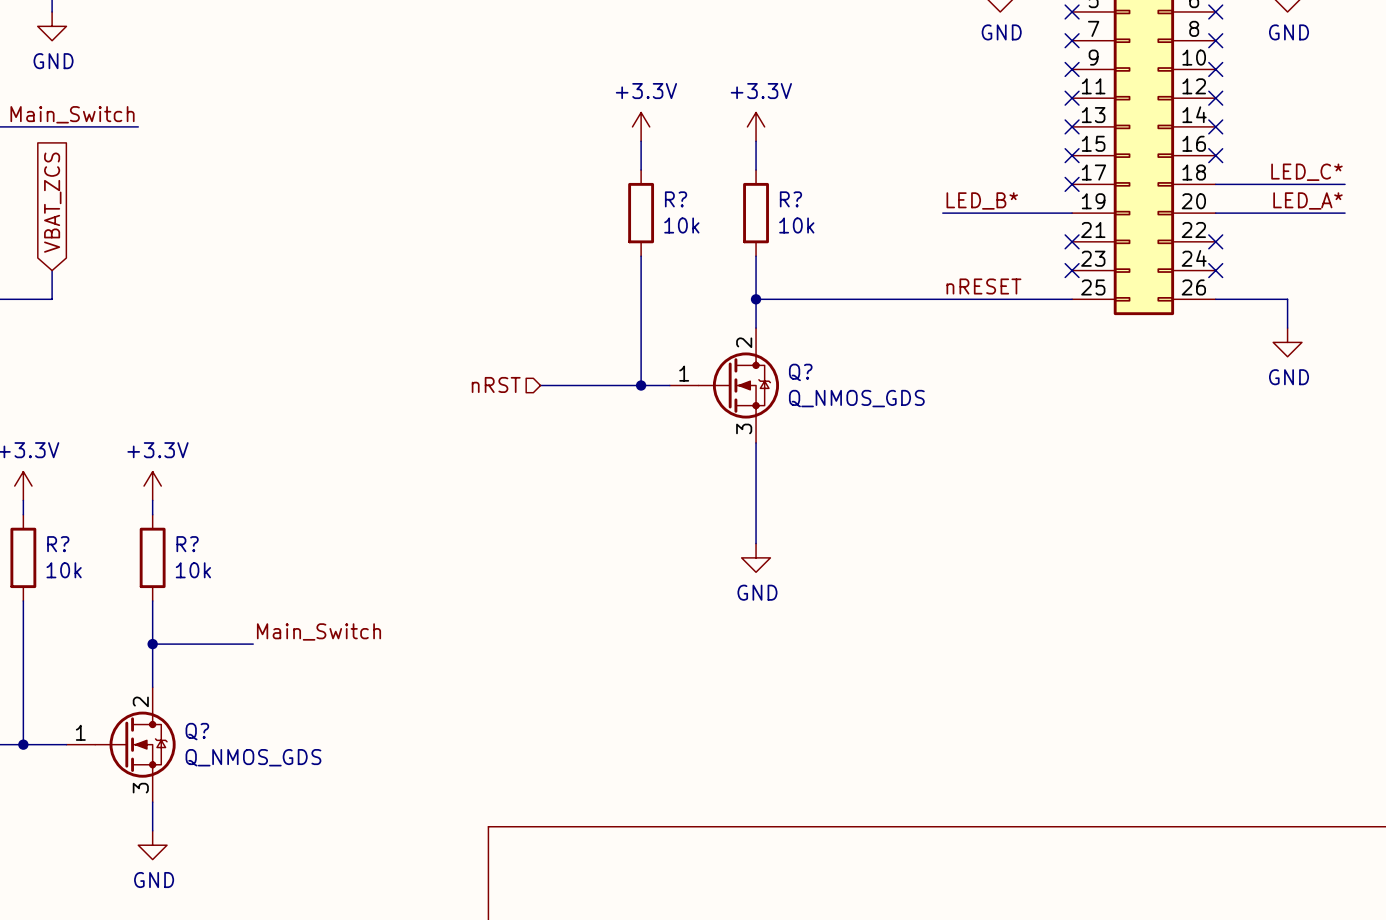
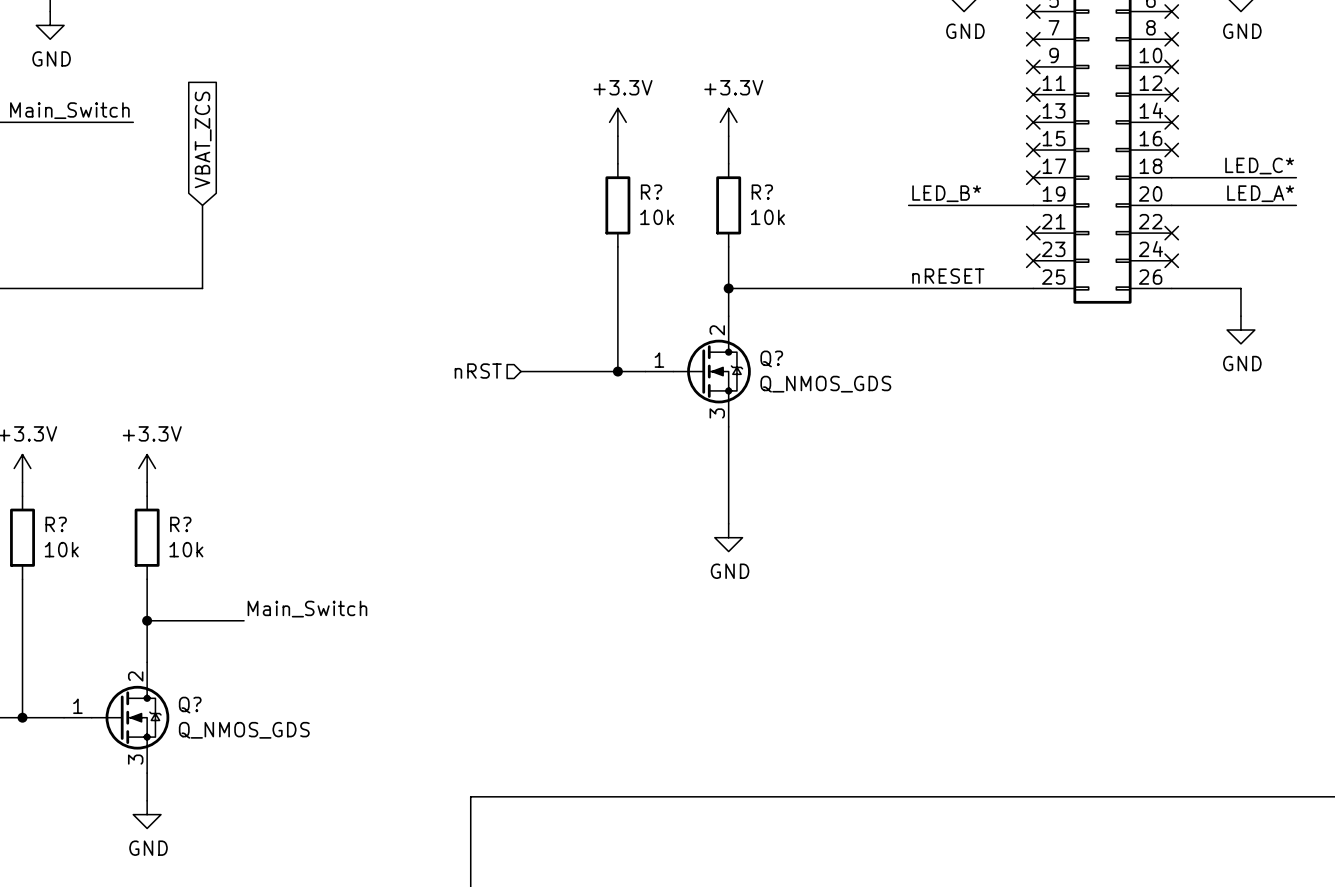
global label position: VBAT_ZCS (52, 202) -> VBAT_ZCS (203, 139)
wire: (52, 270) (52, 299) -> (202, 205) (202, 288) (50, 288)

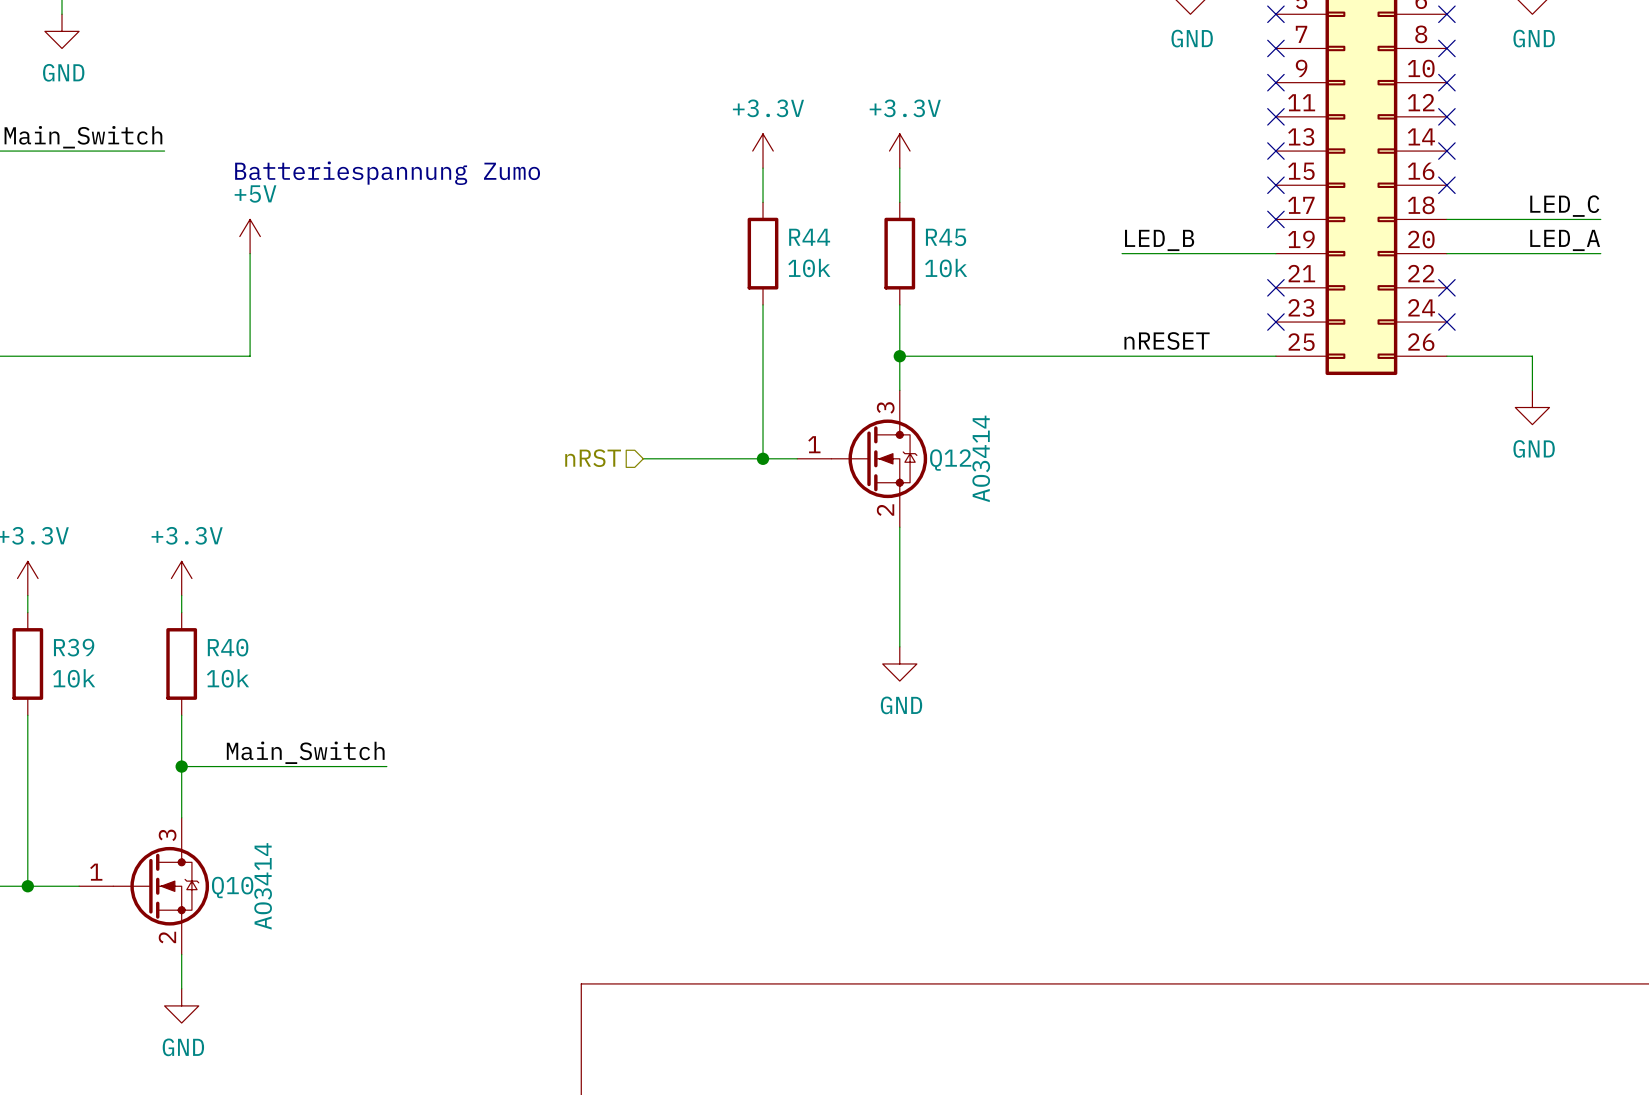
global label: VBAT_ZCS (203, 139) -> none
text: none -> Batteriespannung Zumo (387, 173)
label: LED_C* (1259, 166) -> LED_C (1564, 206)
power symbol: none -> +5V (250, 236)
R? name: R? (651, 192) -> R44 (809, 237)
R? name: R? (762, 192) -> R45 (946, 237)
label: LED_B* (946, 193) -> LED_B (1159, 240)
label: LED_A* (1260, 193) -> LED_A (1565, 240)
Q? pin number: 2 (717, 330) -> 3 (885, 407)
Q? name: Q? (771, 358) -> Q12 (950, 460)
Q? value: Q_NMOS_GDS (825, 384) -> AO3414 (981, 458)
Q? pin number: 3 (717, 413) -> 2 (885, 510)
R? name: R? (56, 524) -> R39 (74, 647)
R? name: R? (180, 524) -> R40 (228, 647)
label position: Main_Switch (307, 609) -> Main_Switch (305, 752)
wire: none -> (301, 766) (386, 766)
Q? pin number: 2 (135, 676) -> 3 (167, 835)
Q? name: Q? (190, 705) -> Q10 (232, 887)
Q? value: Q_NMOS_GDS (244, 730) -> AO3414 (263, 886)
Q? pin number: 3 (135, 759) -> 2 (167, 937)

